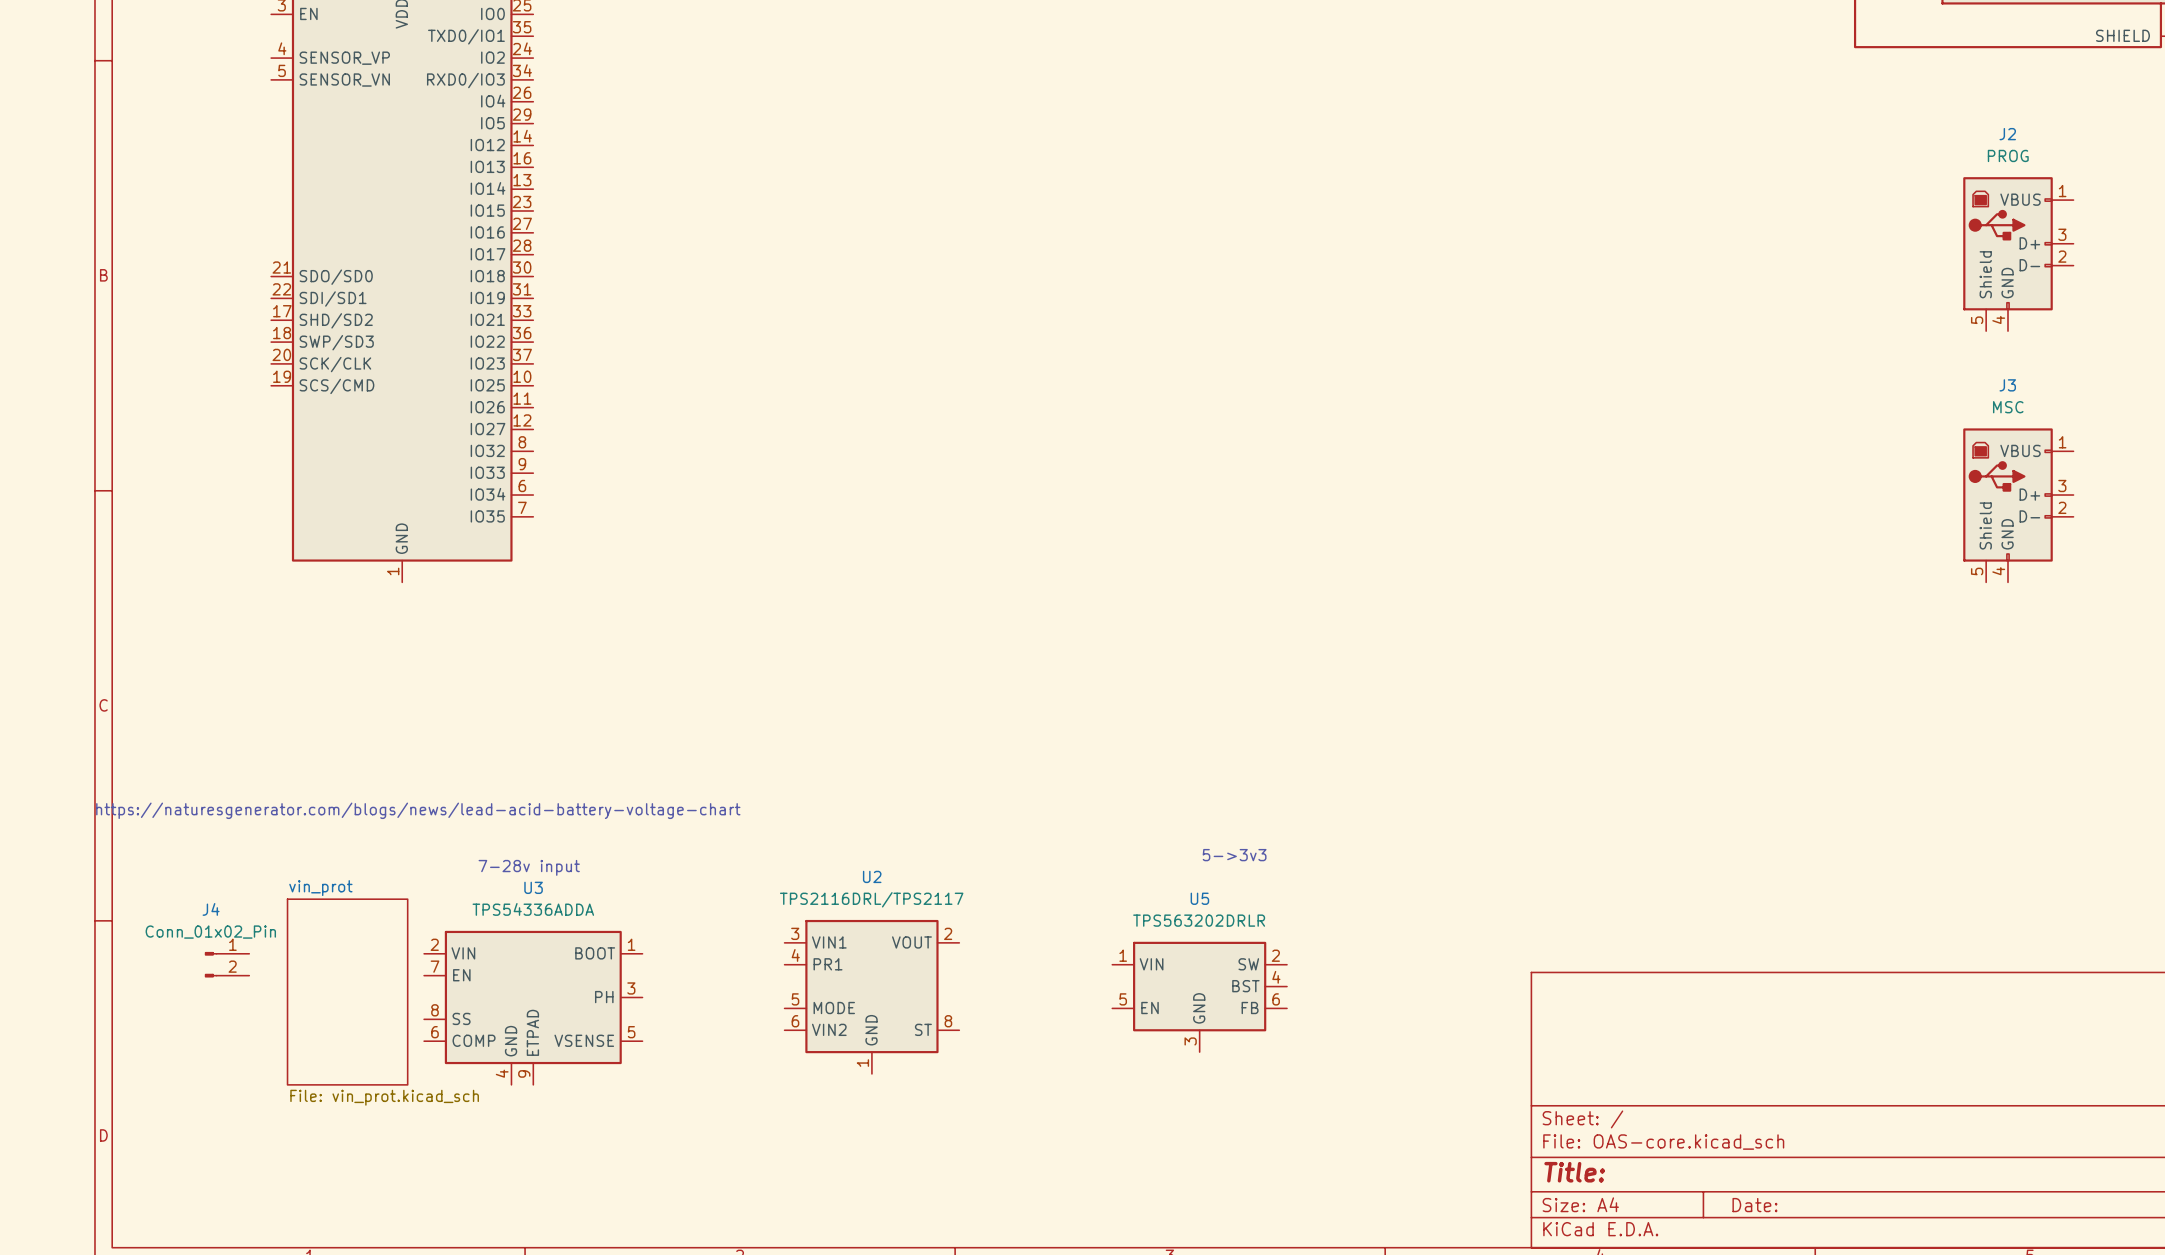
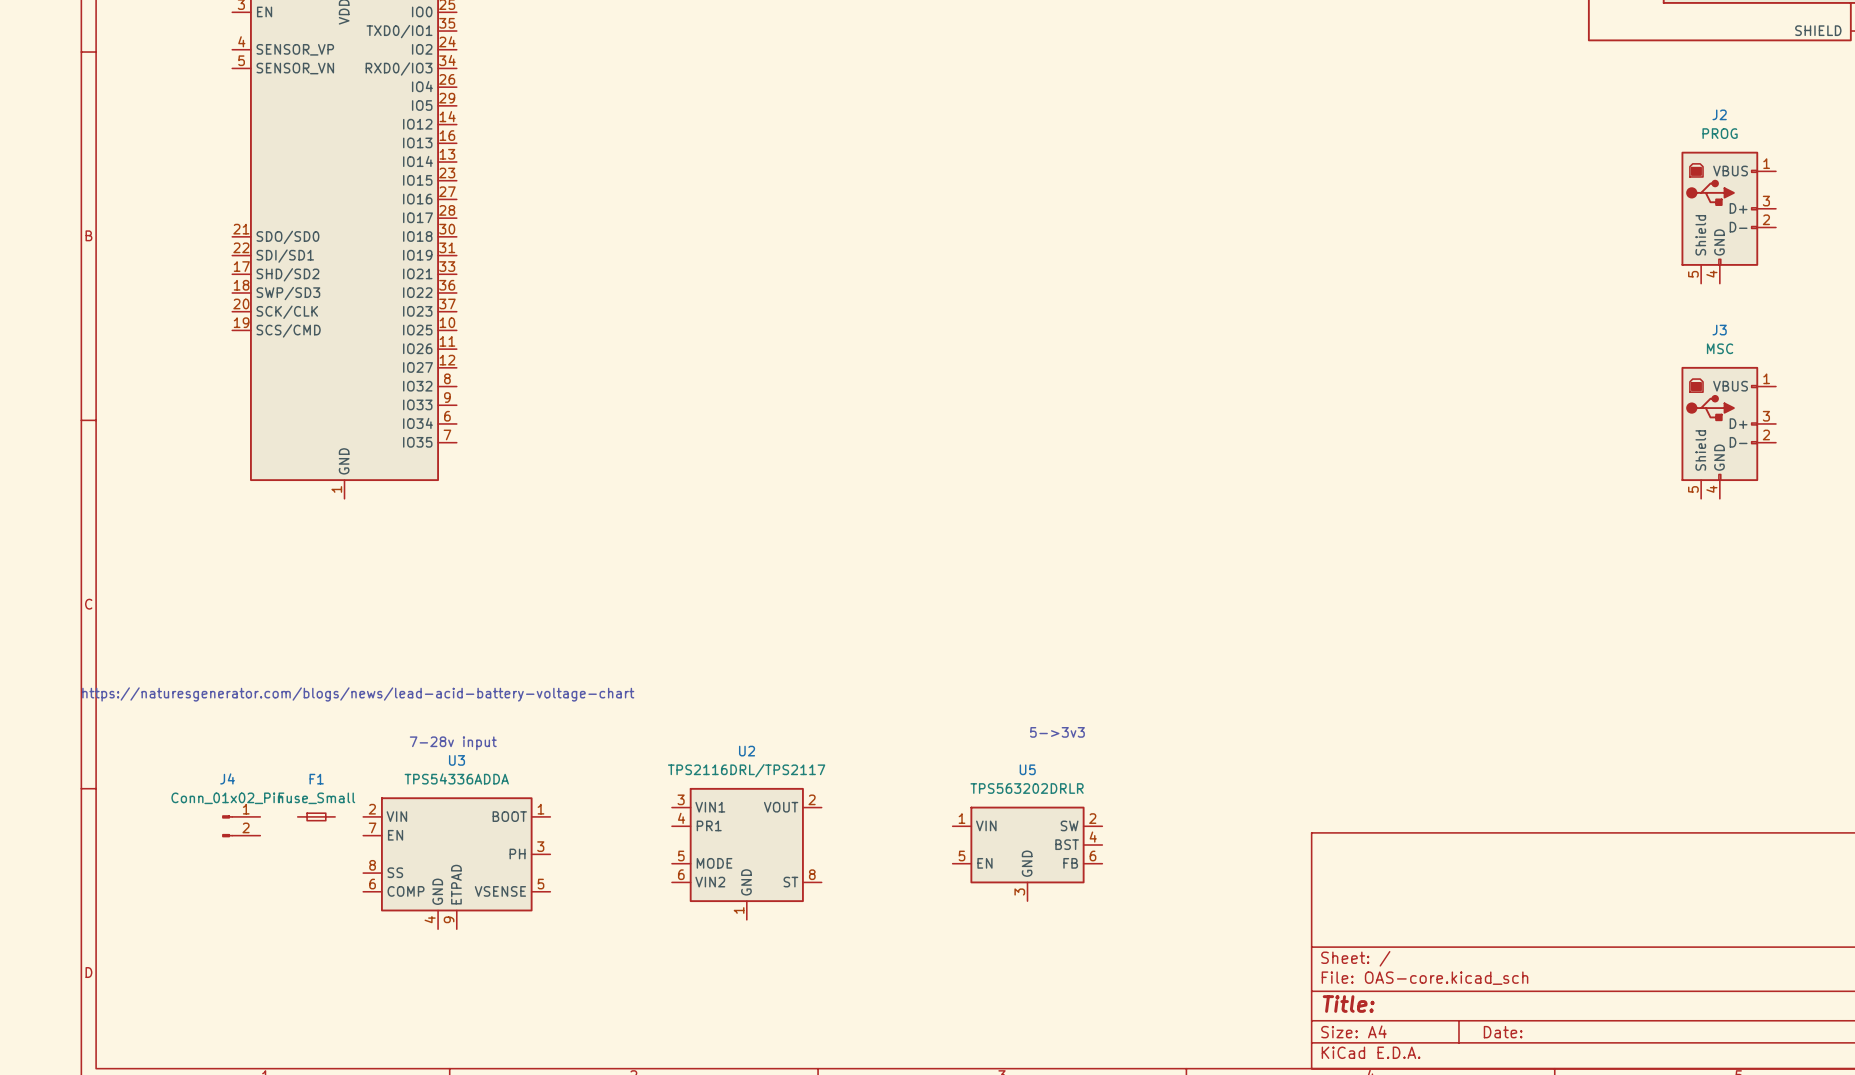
F1: none -> Fuse_Small (316, 816)
J4 position: (227, 964) -> (241, 826)
sheet vin_prot: File: vin_prot.kicad_sch (347, 992) -> none

